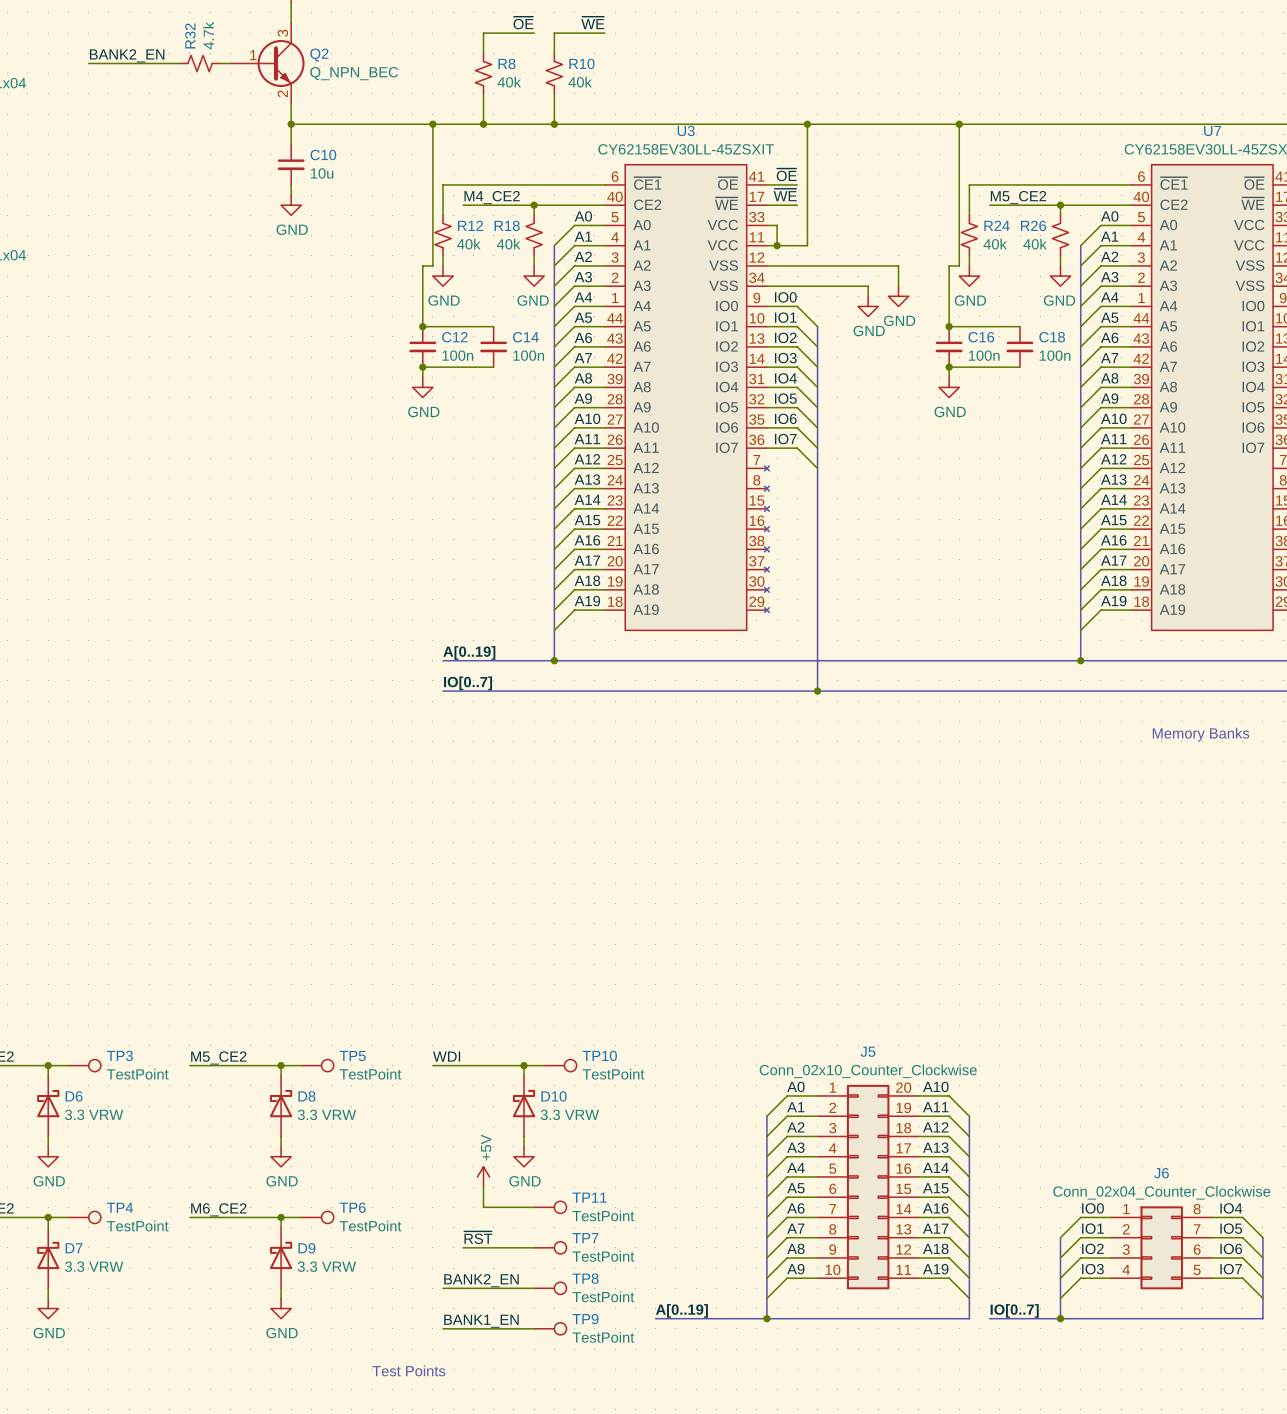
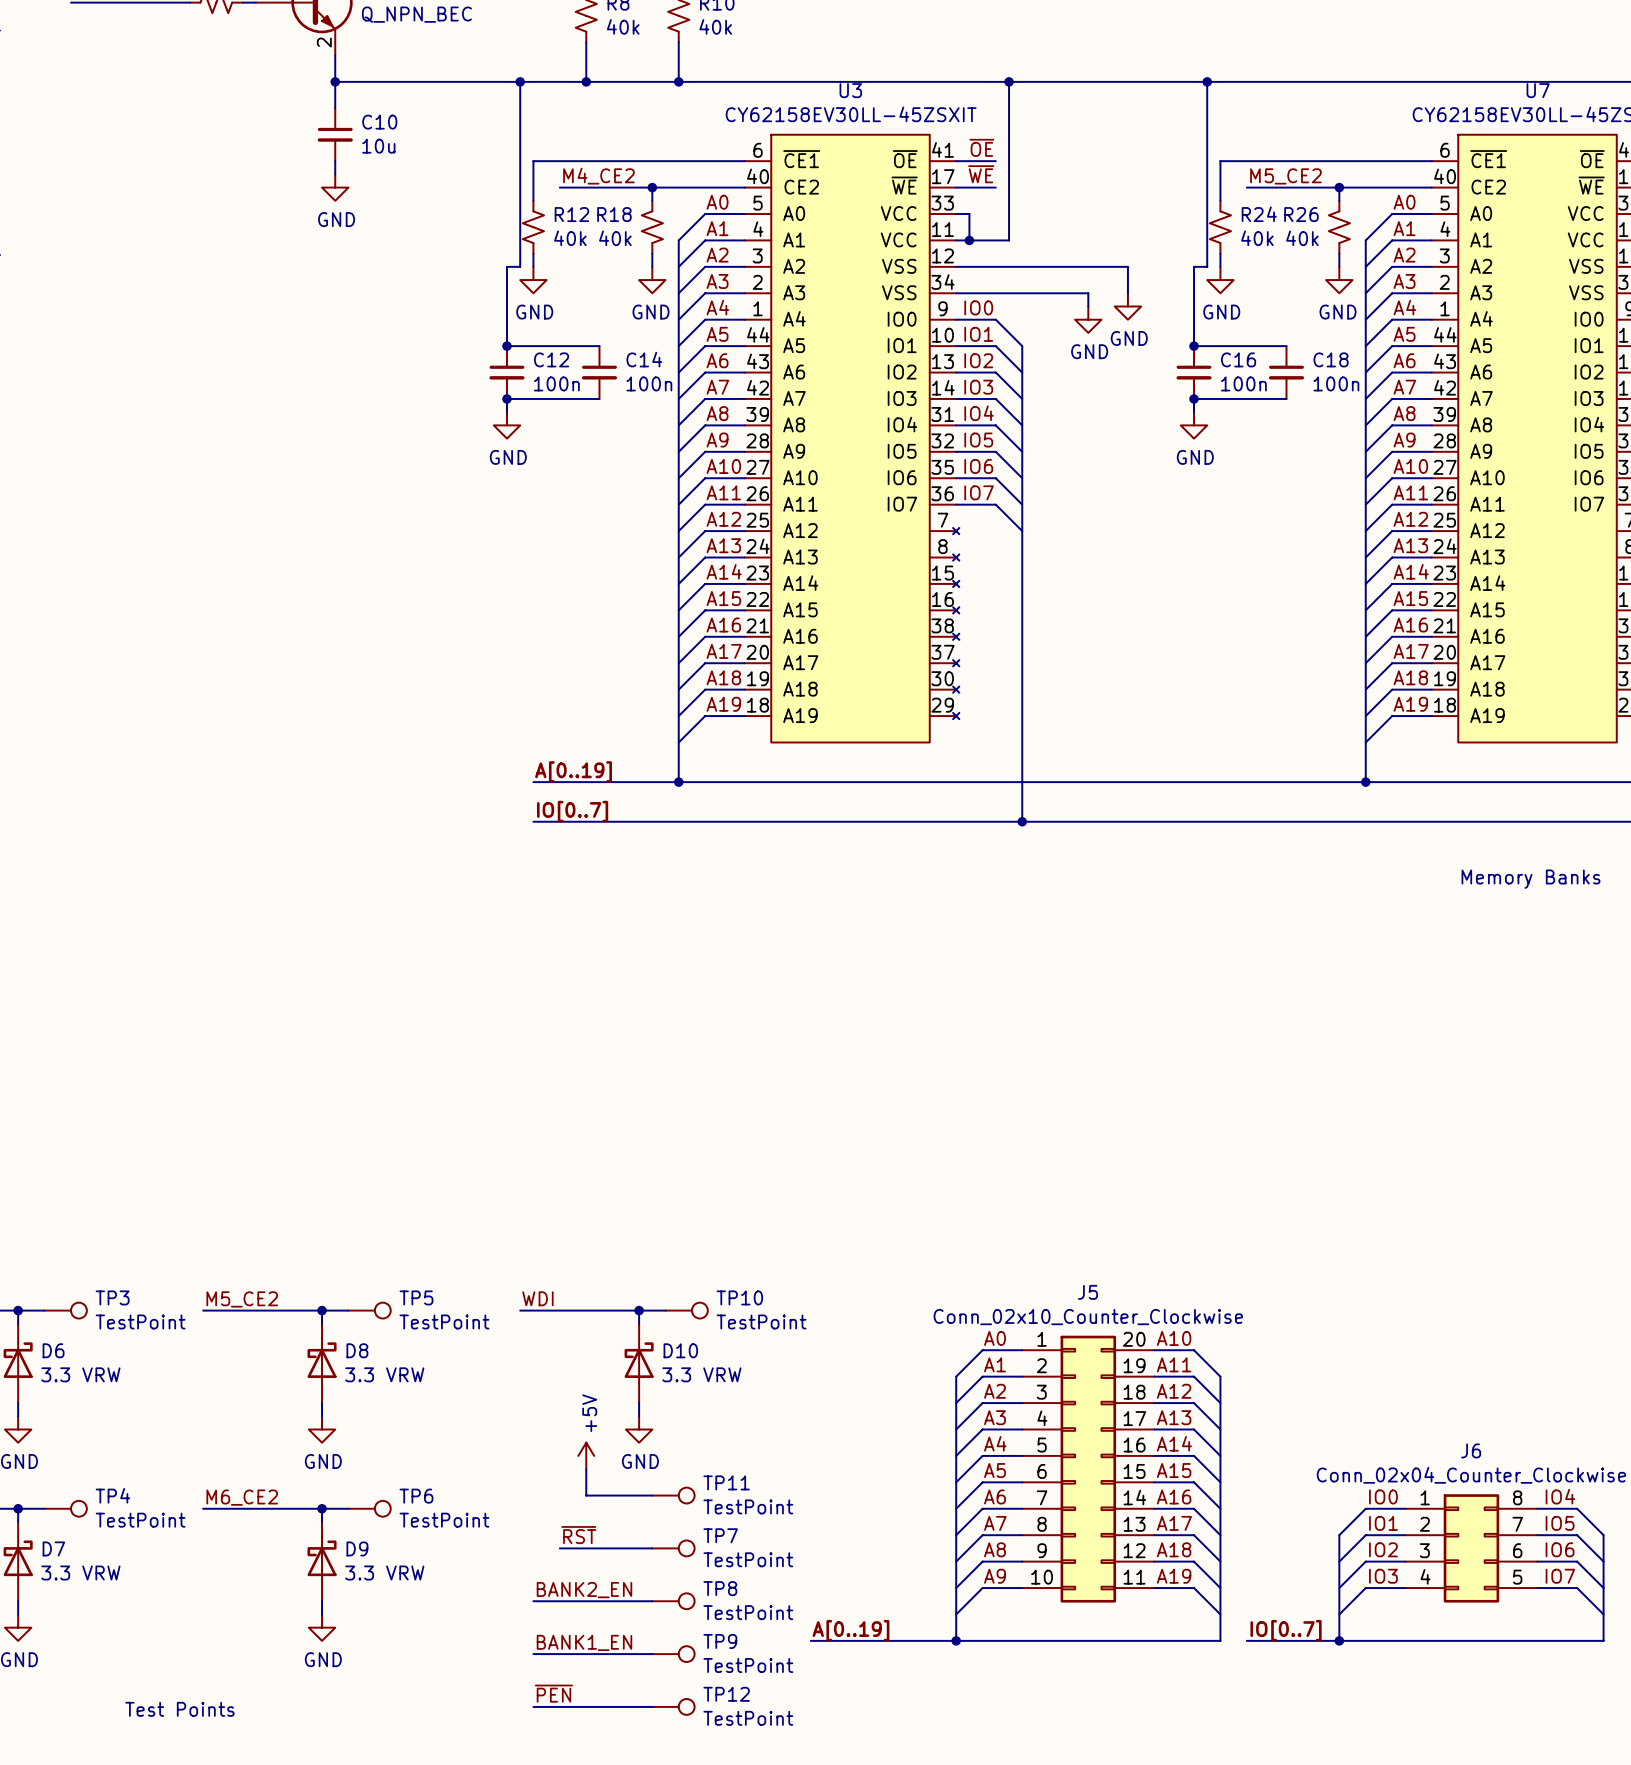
label: none -> ~{PEN} (553, 1693)
wire: none -> (533, 1706) (652, 1706)
TP12: none -> TestPoint (673, 1706)
text: none -> Test Points (179, 1709)
text: Test Points (408, 1370) -> none

